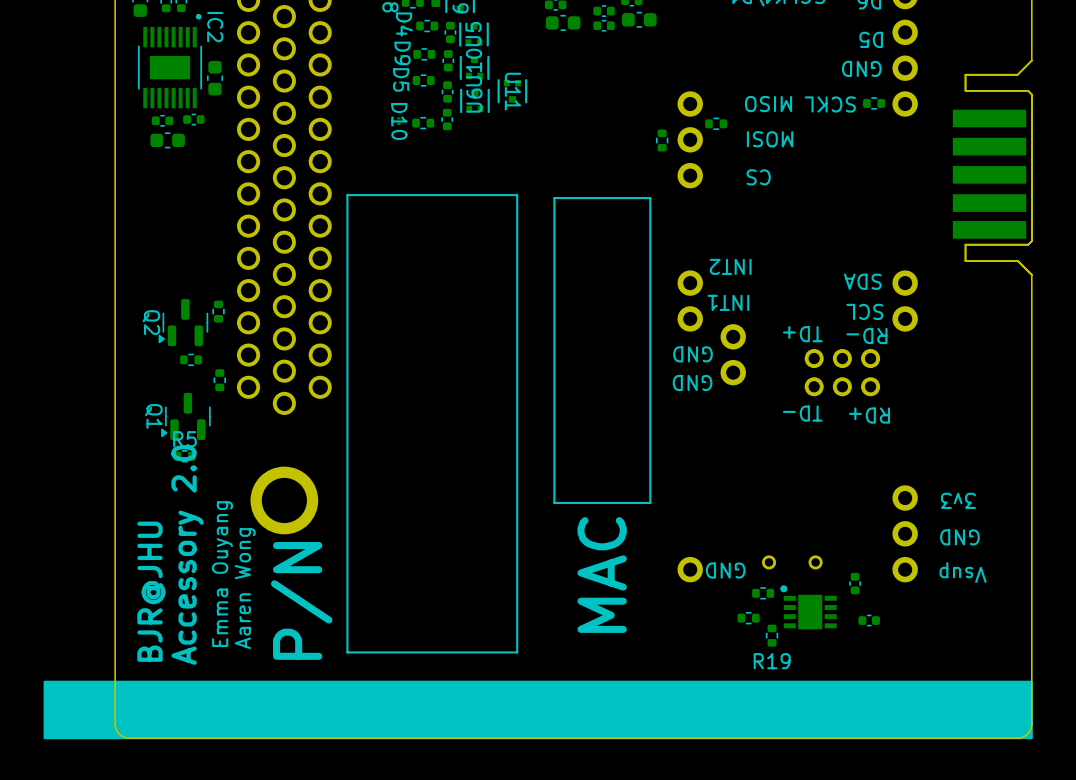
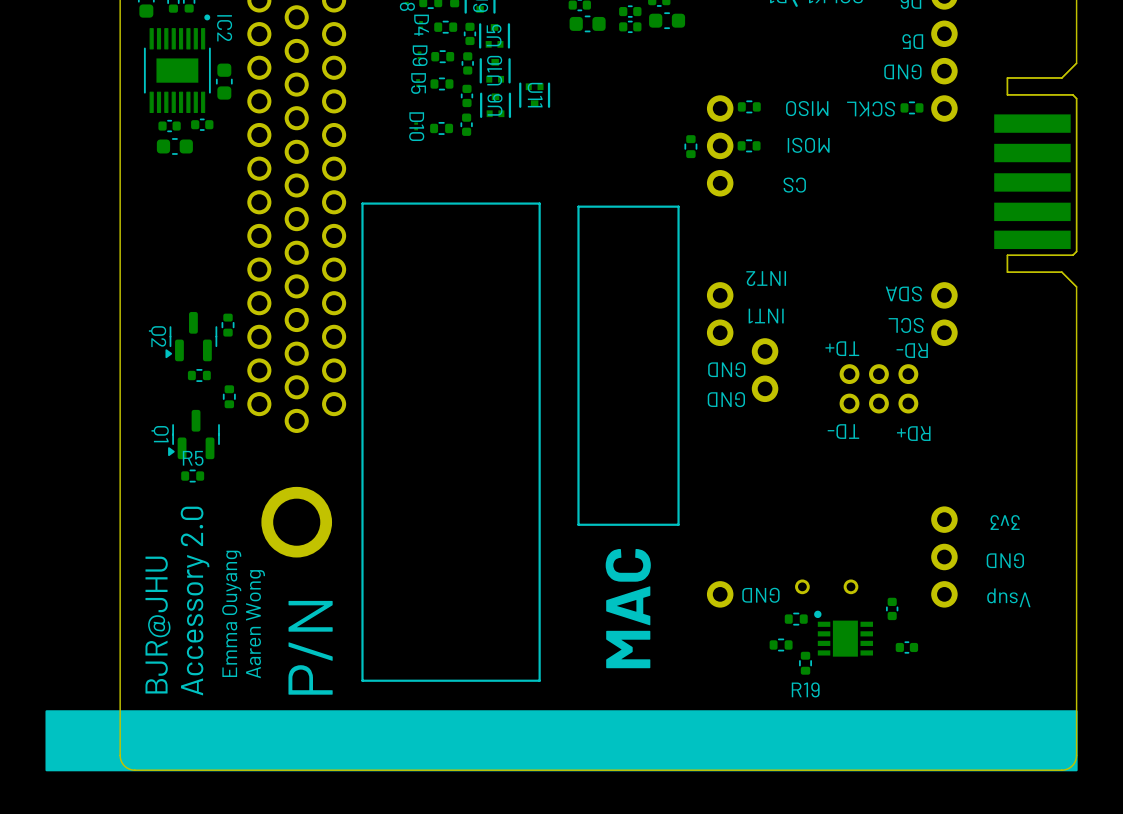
part: none -> (749, 106)
part: (716, 123) -> none
part: none -> (749, 145)

